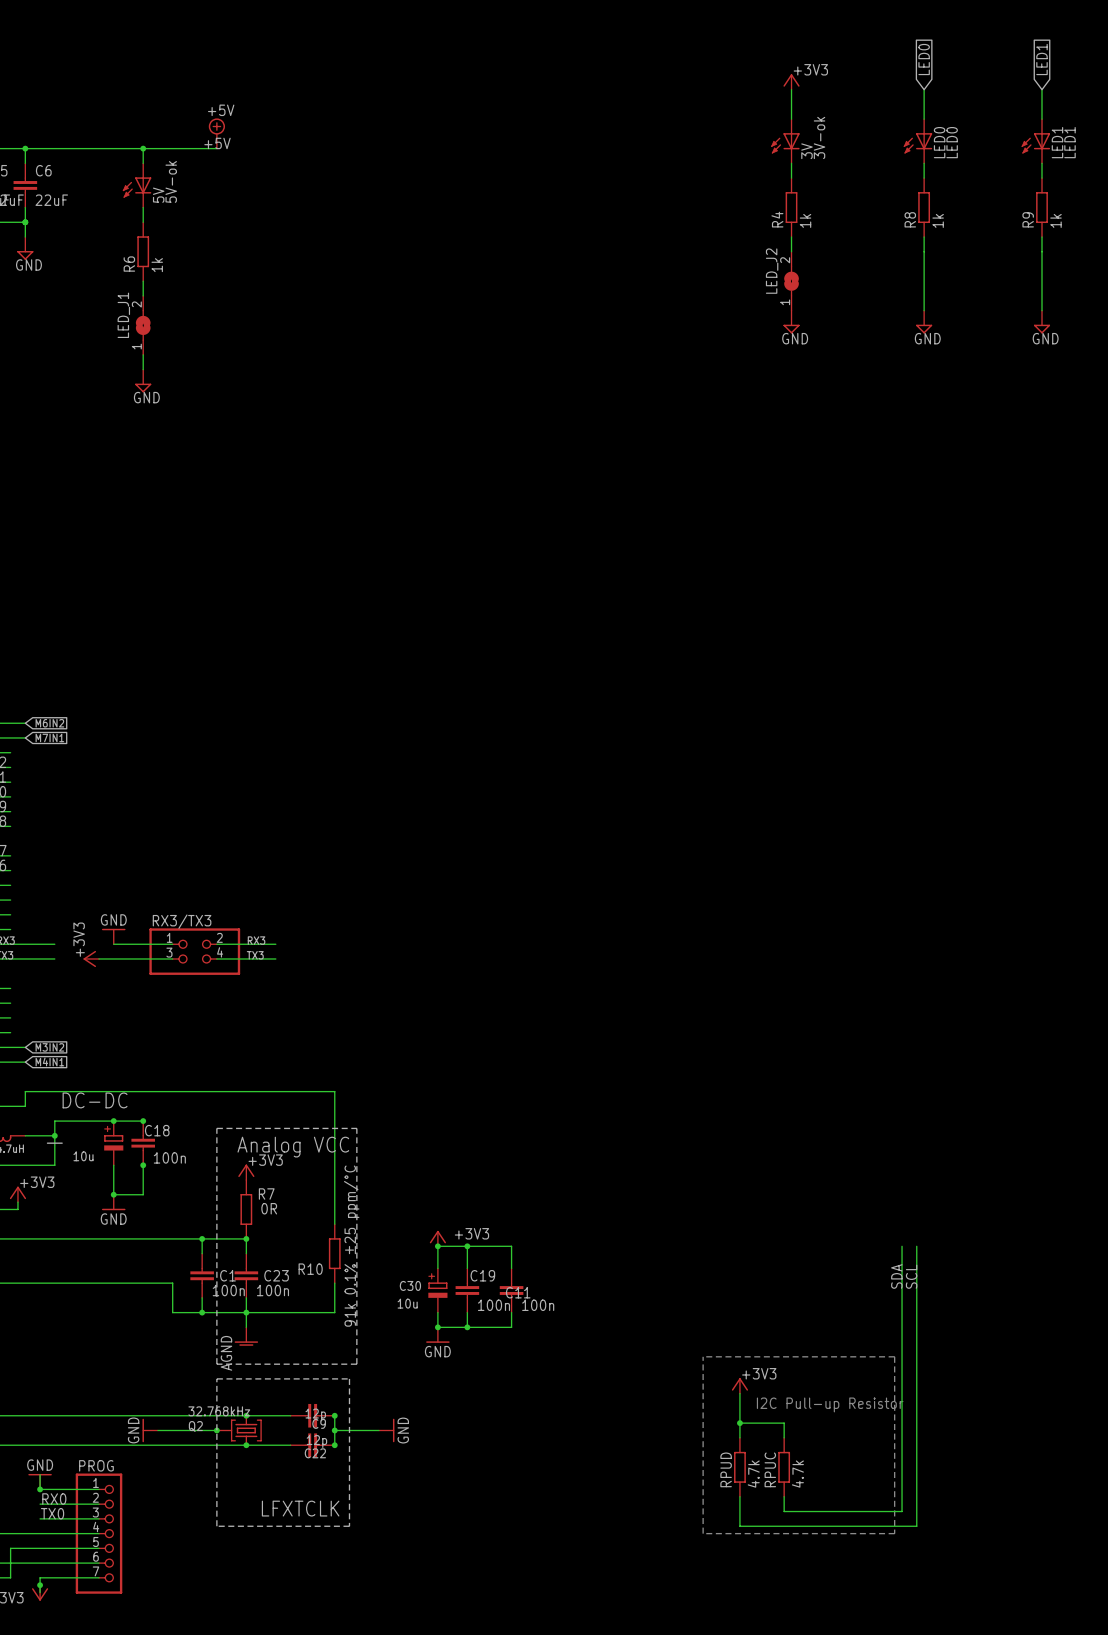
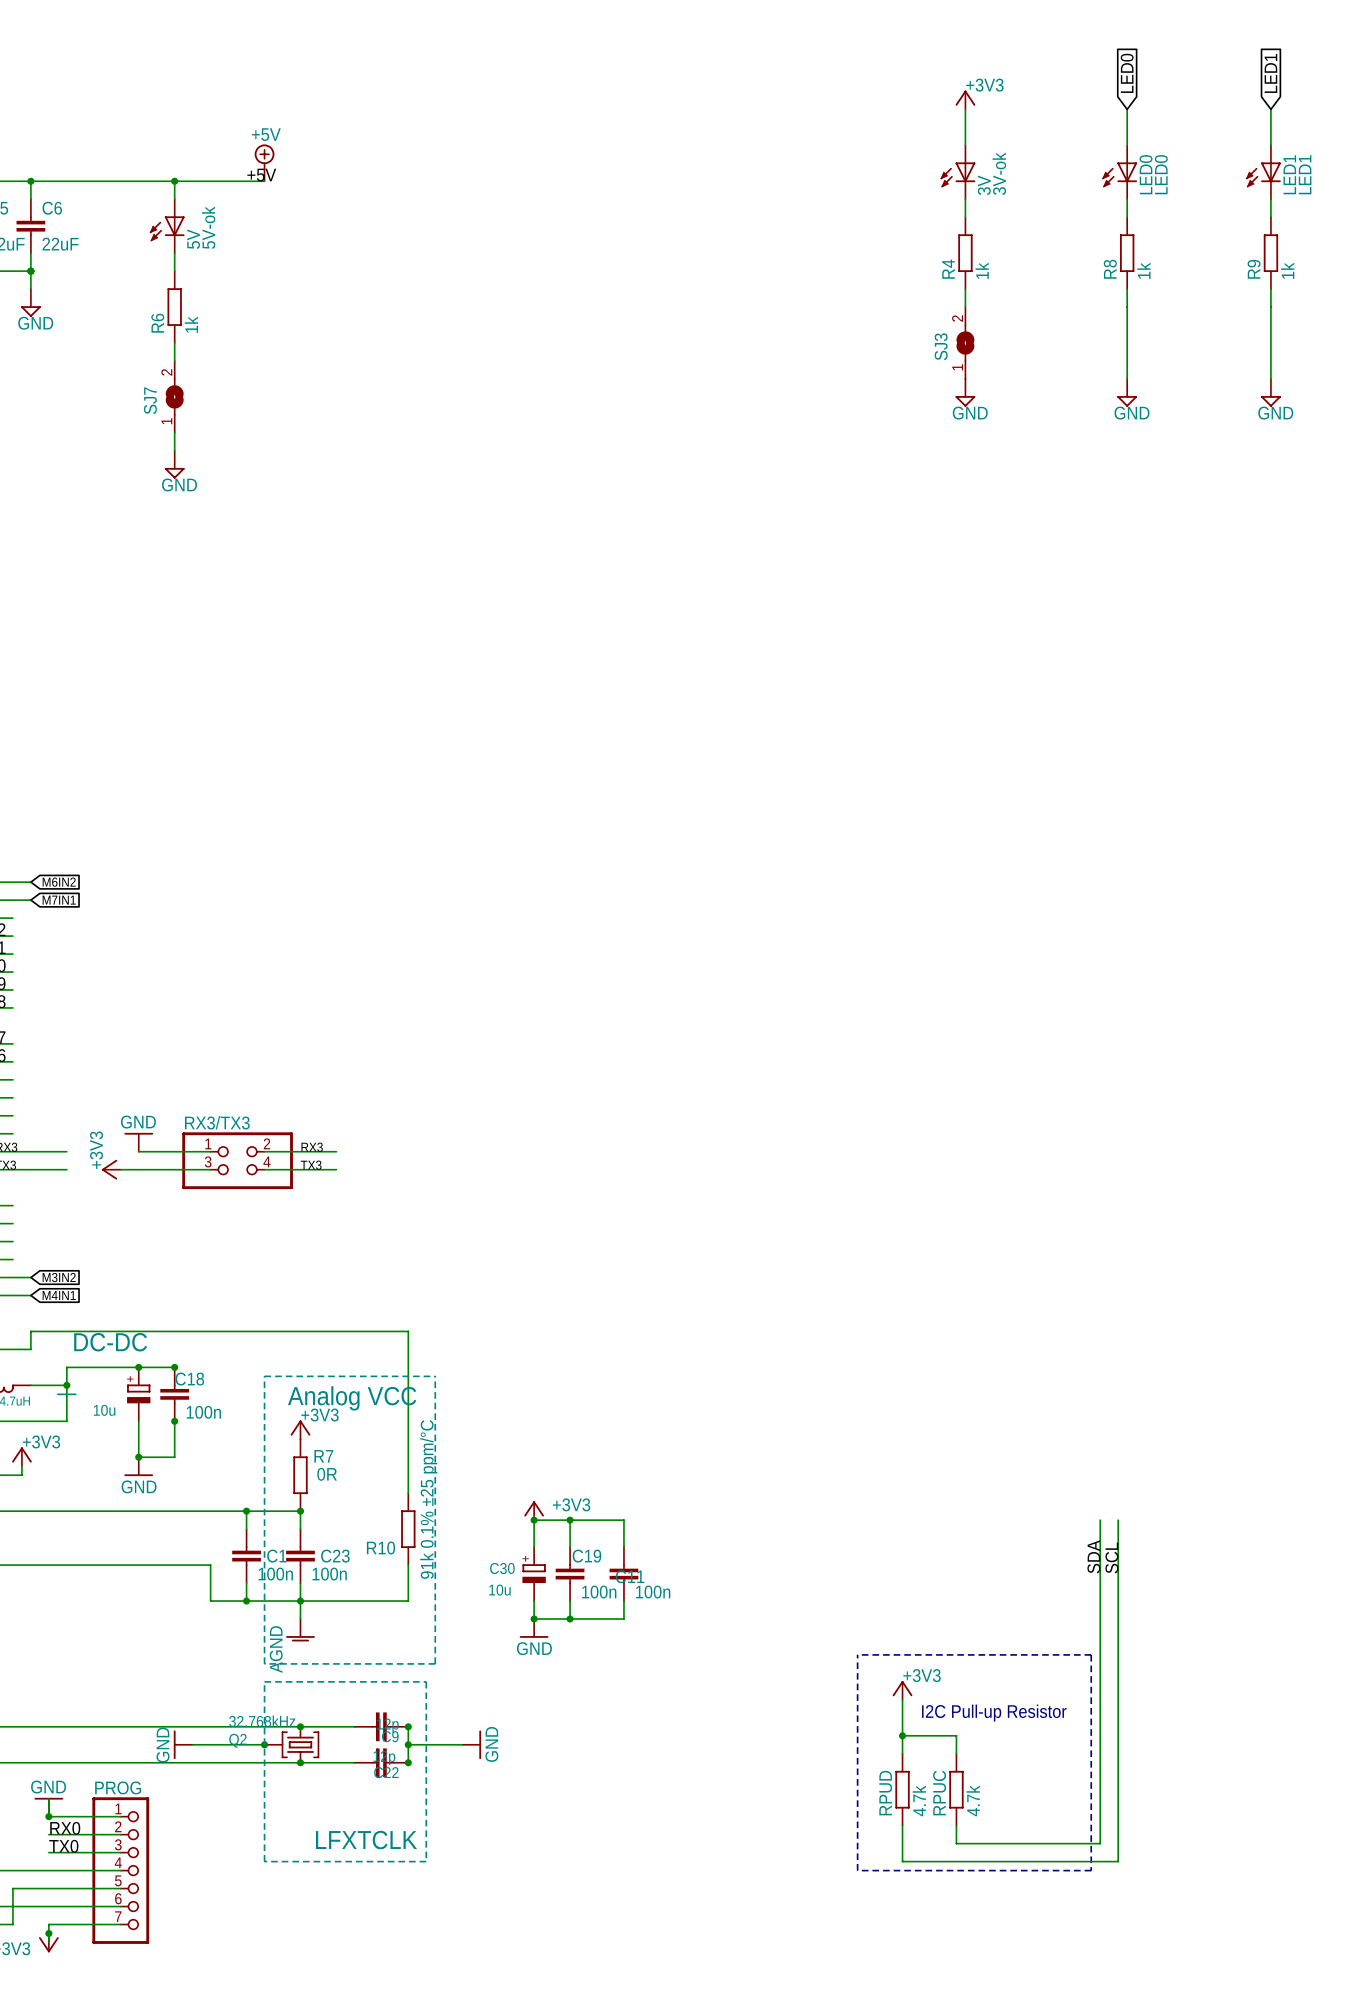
LED_J2 name: LED_J2 (772, 271) -> SJ3 (941, 346)
LED_J1 name: LED_J1 (123, 315) -> SJ7 (150, 400)

